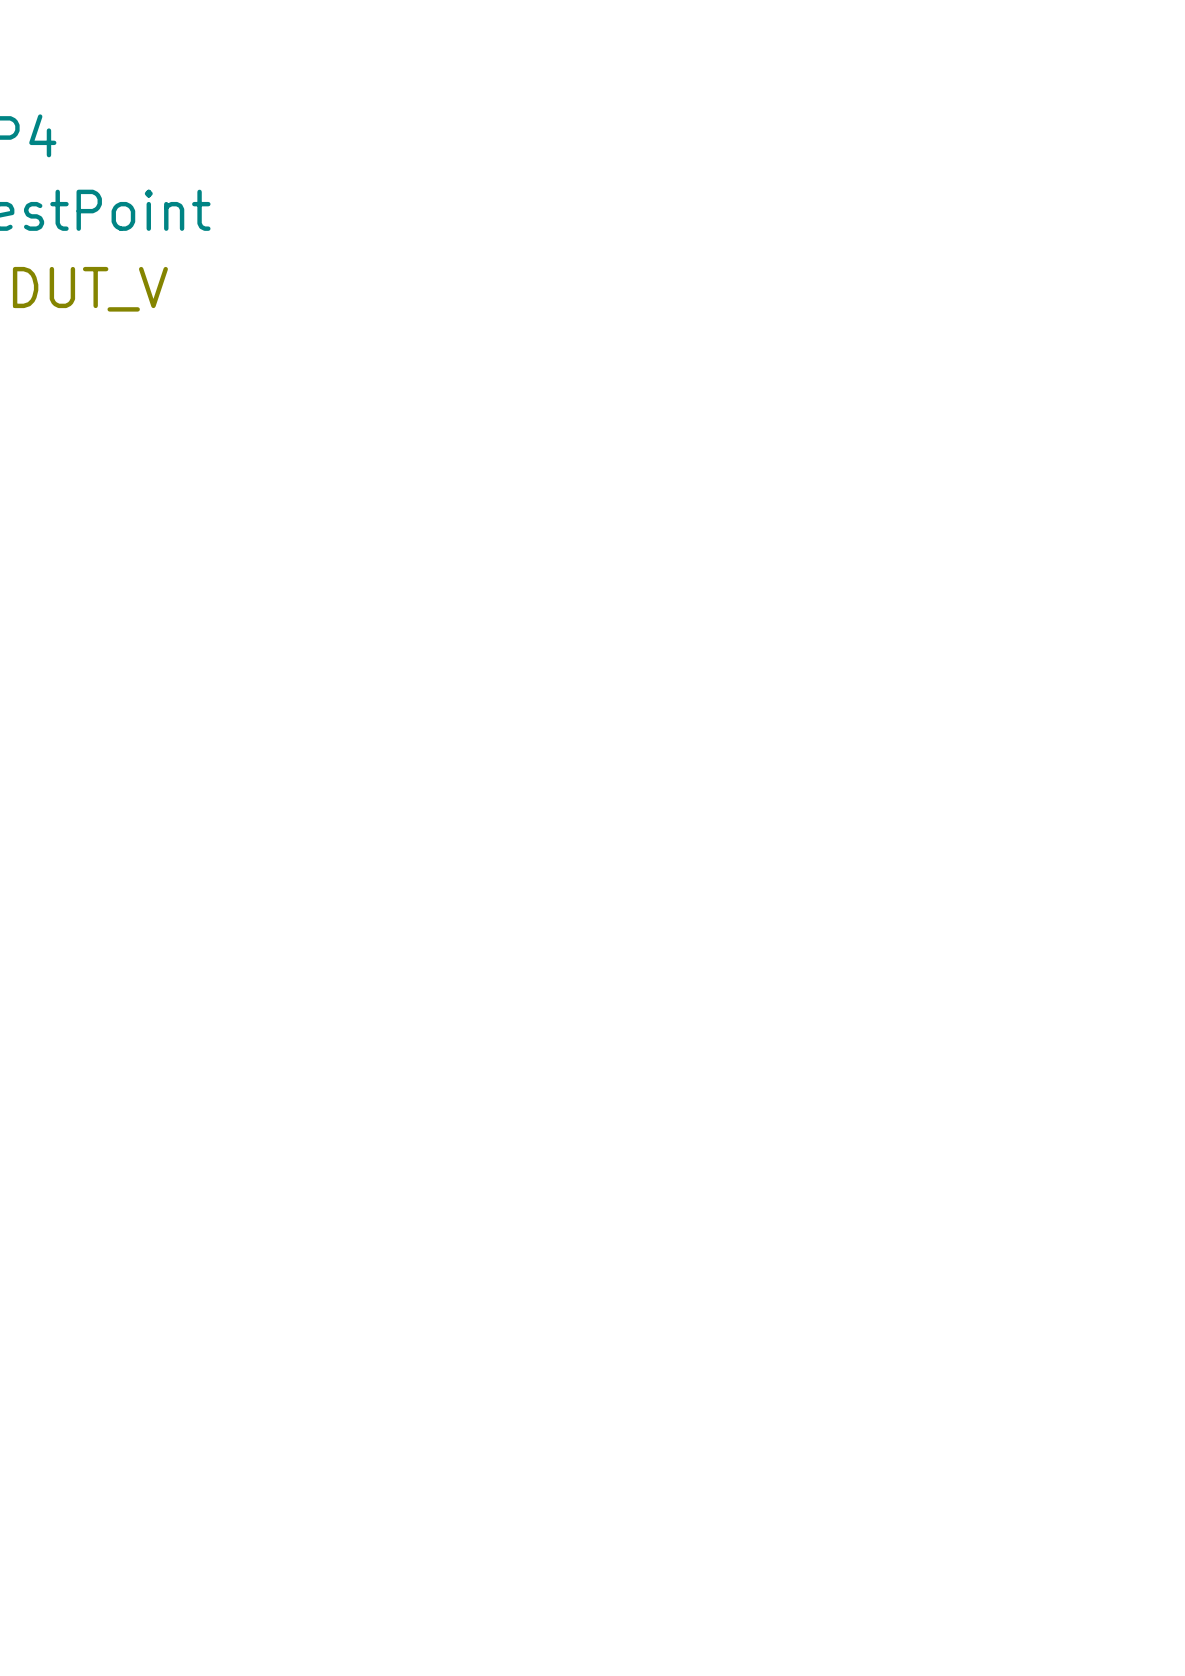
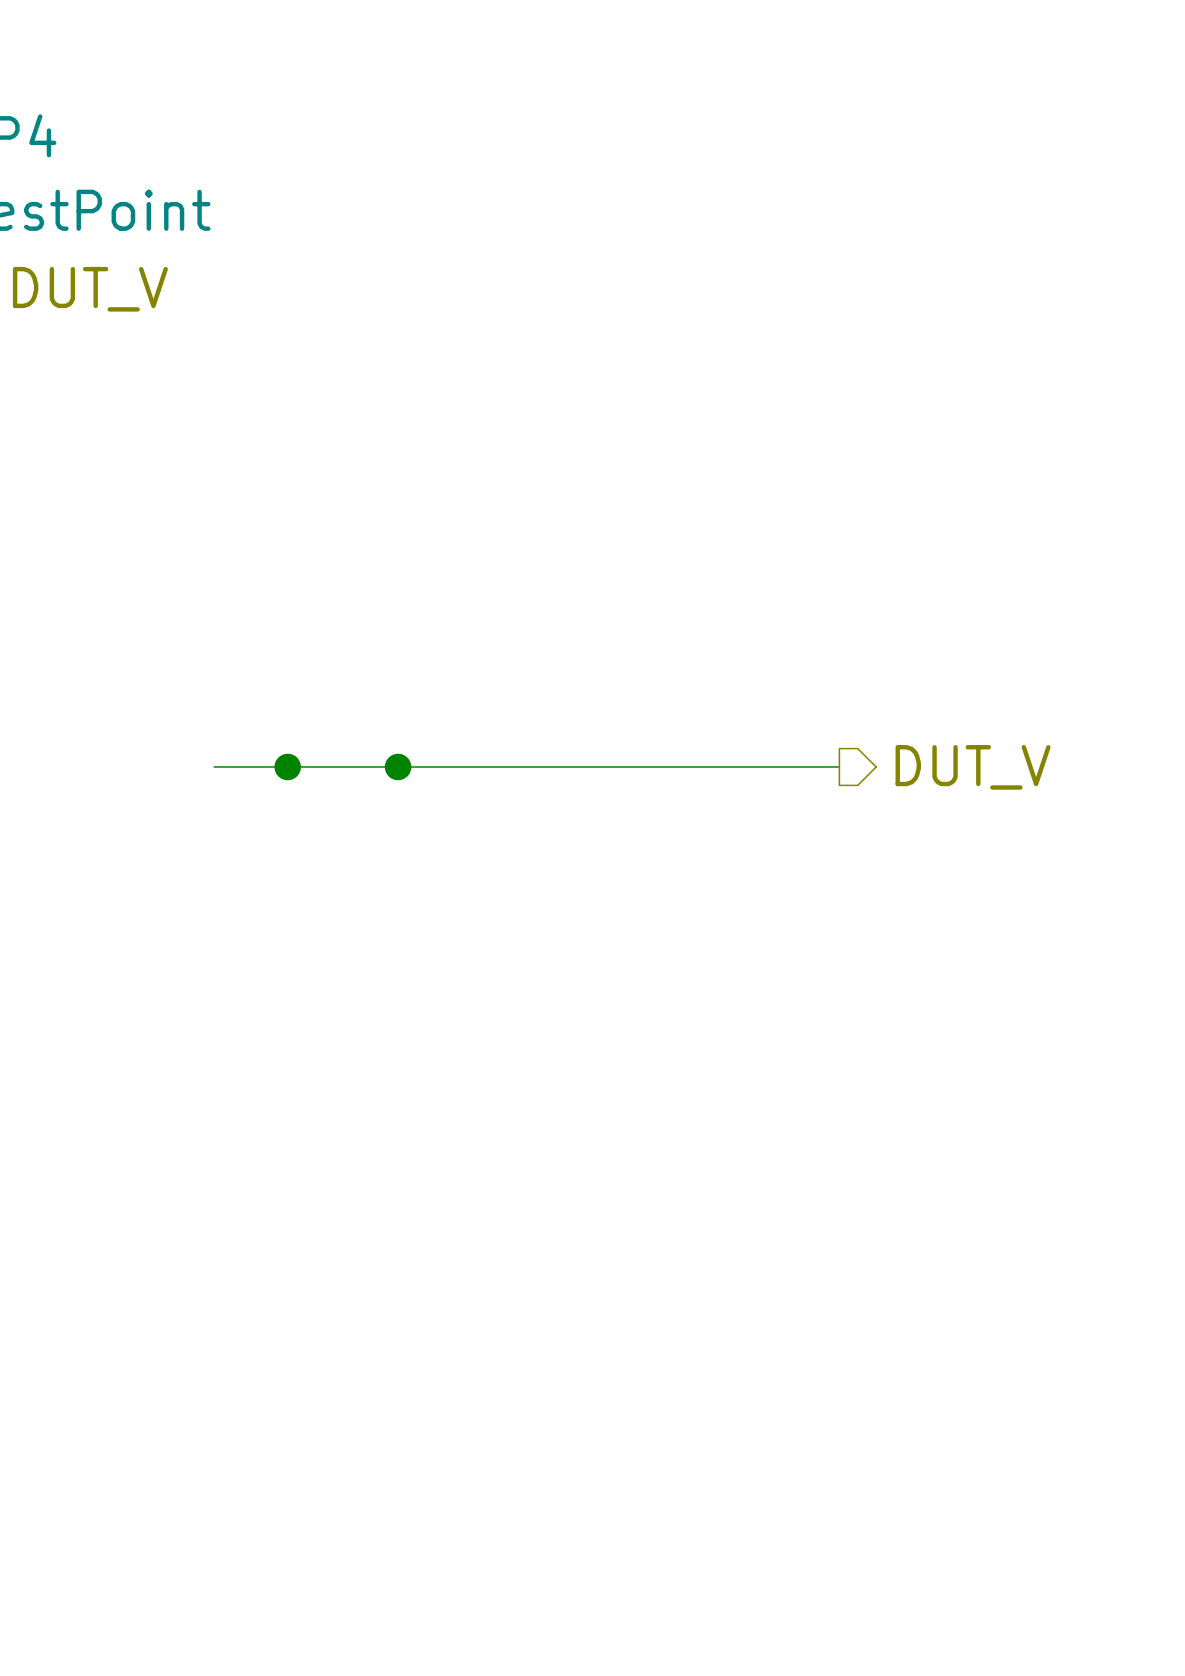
wire: none -> (214, 766) (839, 766)
junction: none -> (287, 766)
junction: none -> (398, 766)
hierarchical label: none -> DUT_V (973, 767)

